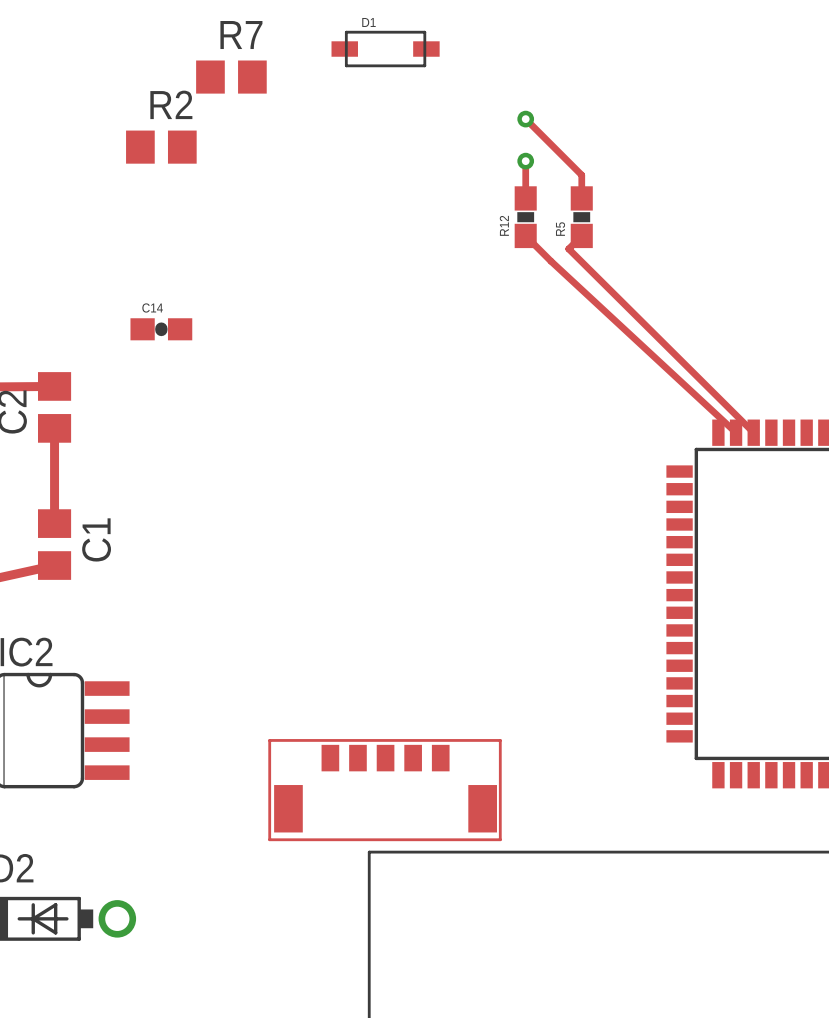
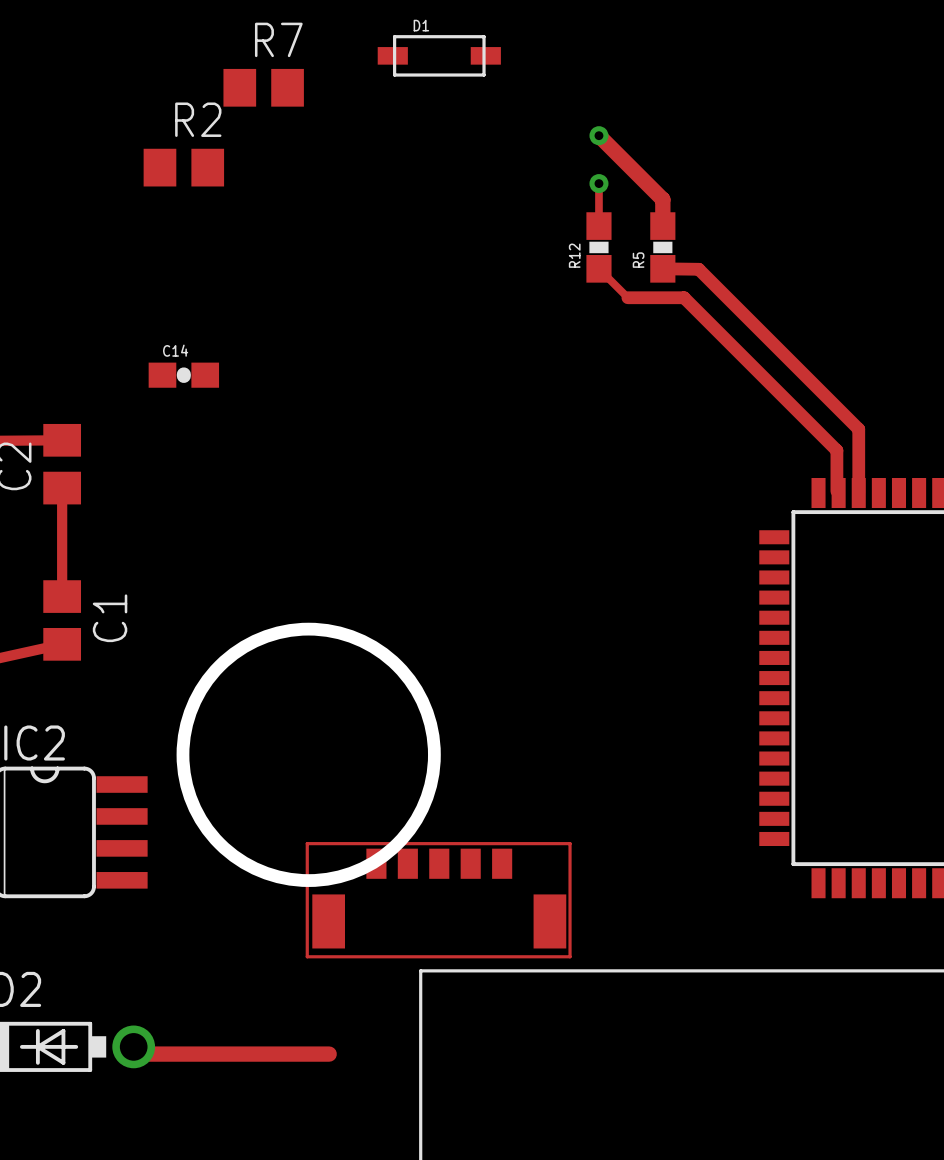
track width: thin (525, 119) (581, 175) (581, 198) -> thick (598, 135) (662, 199) (662, 226)
track: (581, 235) (568, 248) (753, 432) -> (662, 268) (698, 269) (858, 429) (858, 493)
track: (551, 261) (736, 432) -> (627, 297) (684, 297) (836, 450) (836, 491) (838, 493)
round board edge: none -> [176, 622, 441, 887]
track: none -> (133, 1046) (140, 1054) (329, 1054)

